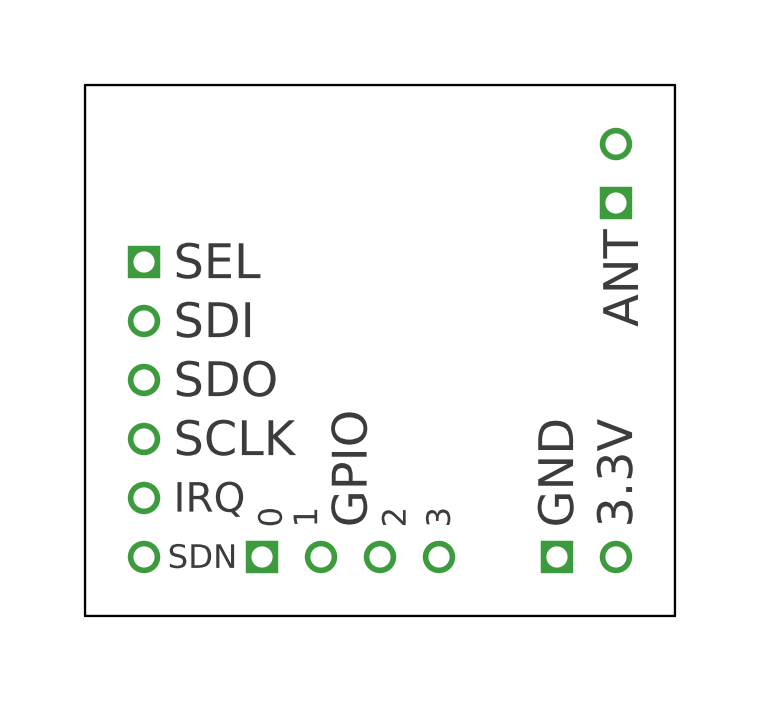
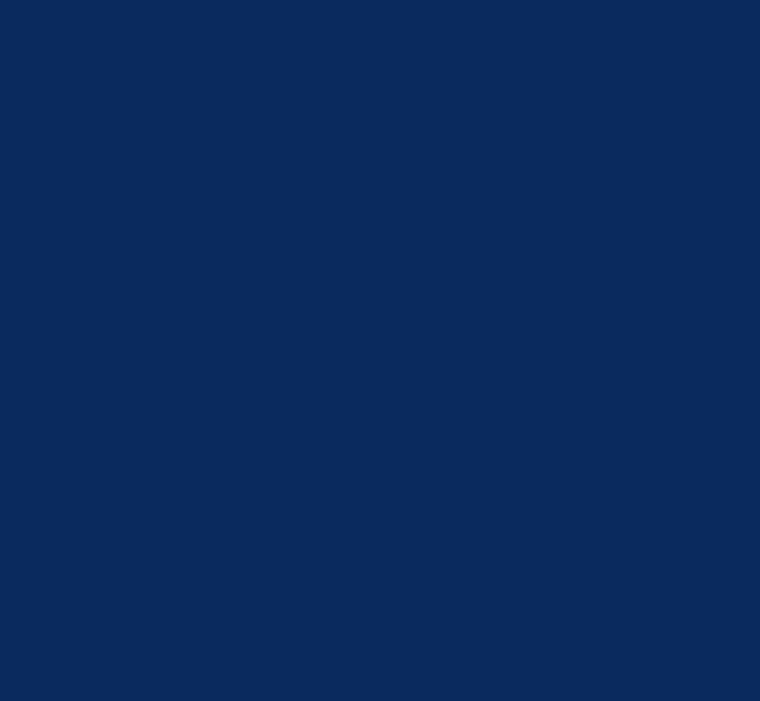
board edge: (674, 85) (85, 85) (85, 615) (674, 615) (674, 85) -> none
part: (615, 173) -> none
text: SEL (218, 260) -> none
text: ANT (620, 277) -> none
text: SDI (213, 319) -> none
text: SDO (226, 378) -> none
part: (144, 409) -> none
text: SCLK (236, 437) -> none
text: GPIO (349, 468) -> none
text: 3.3V (614, 471) -> none
text: GND (555, 472) -> none
text: IRQ (210, 499) -> none
text: 1 (305, 516) -> none
text: 0 (269, 517) -> none
text: 2 (393, 517) -> none
text: 3 (438, 517) -> none
text: SDN (201, 556) -> none
part: (350, 556) -> none
part: (586, 556) -> none

